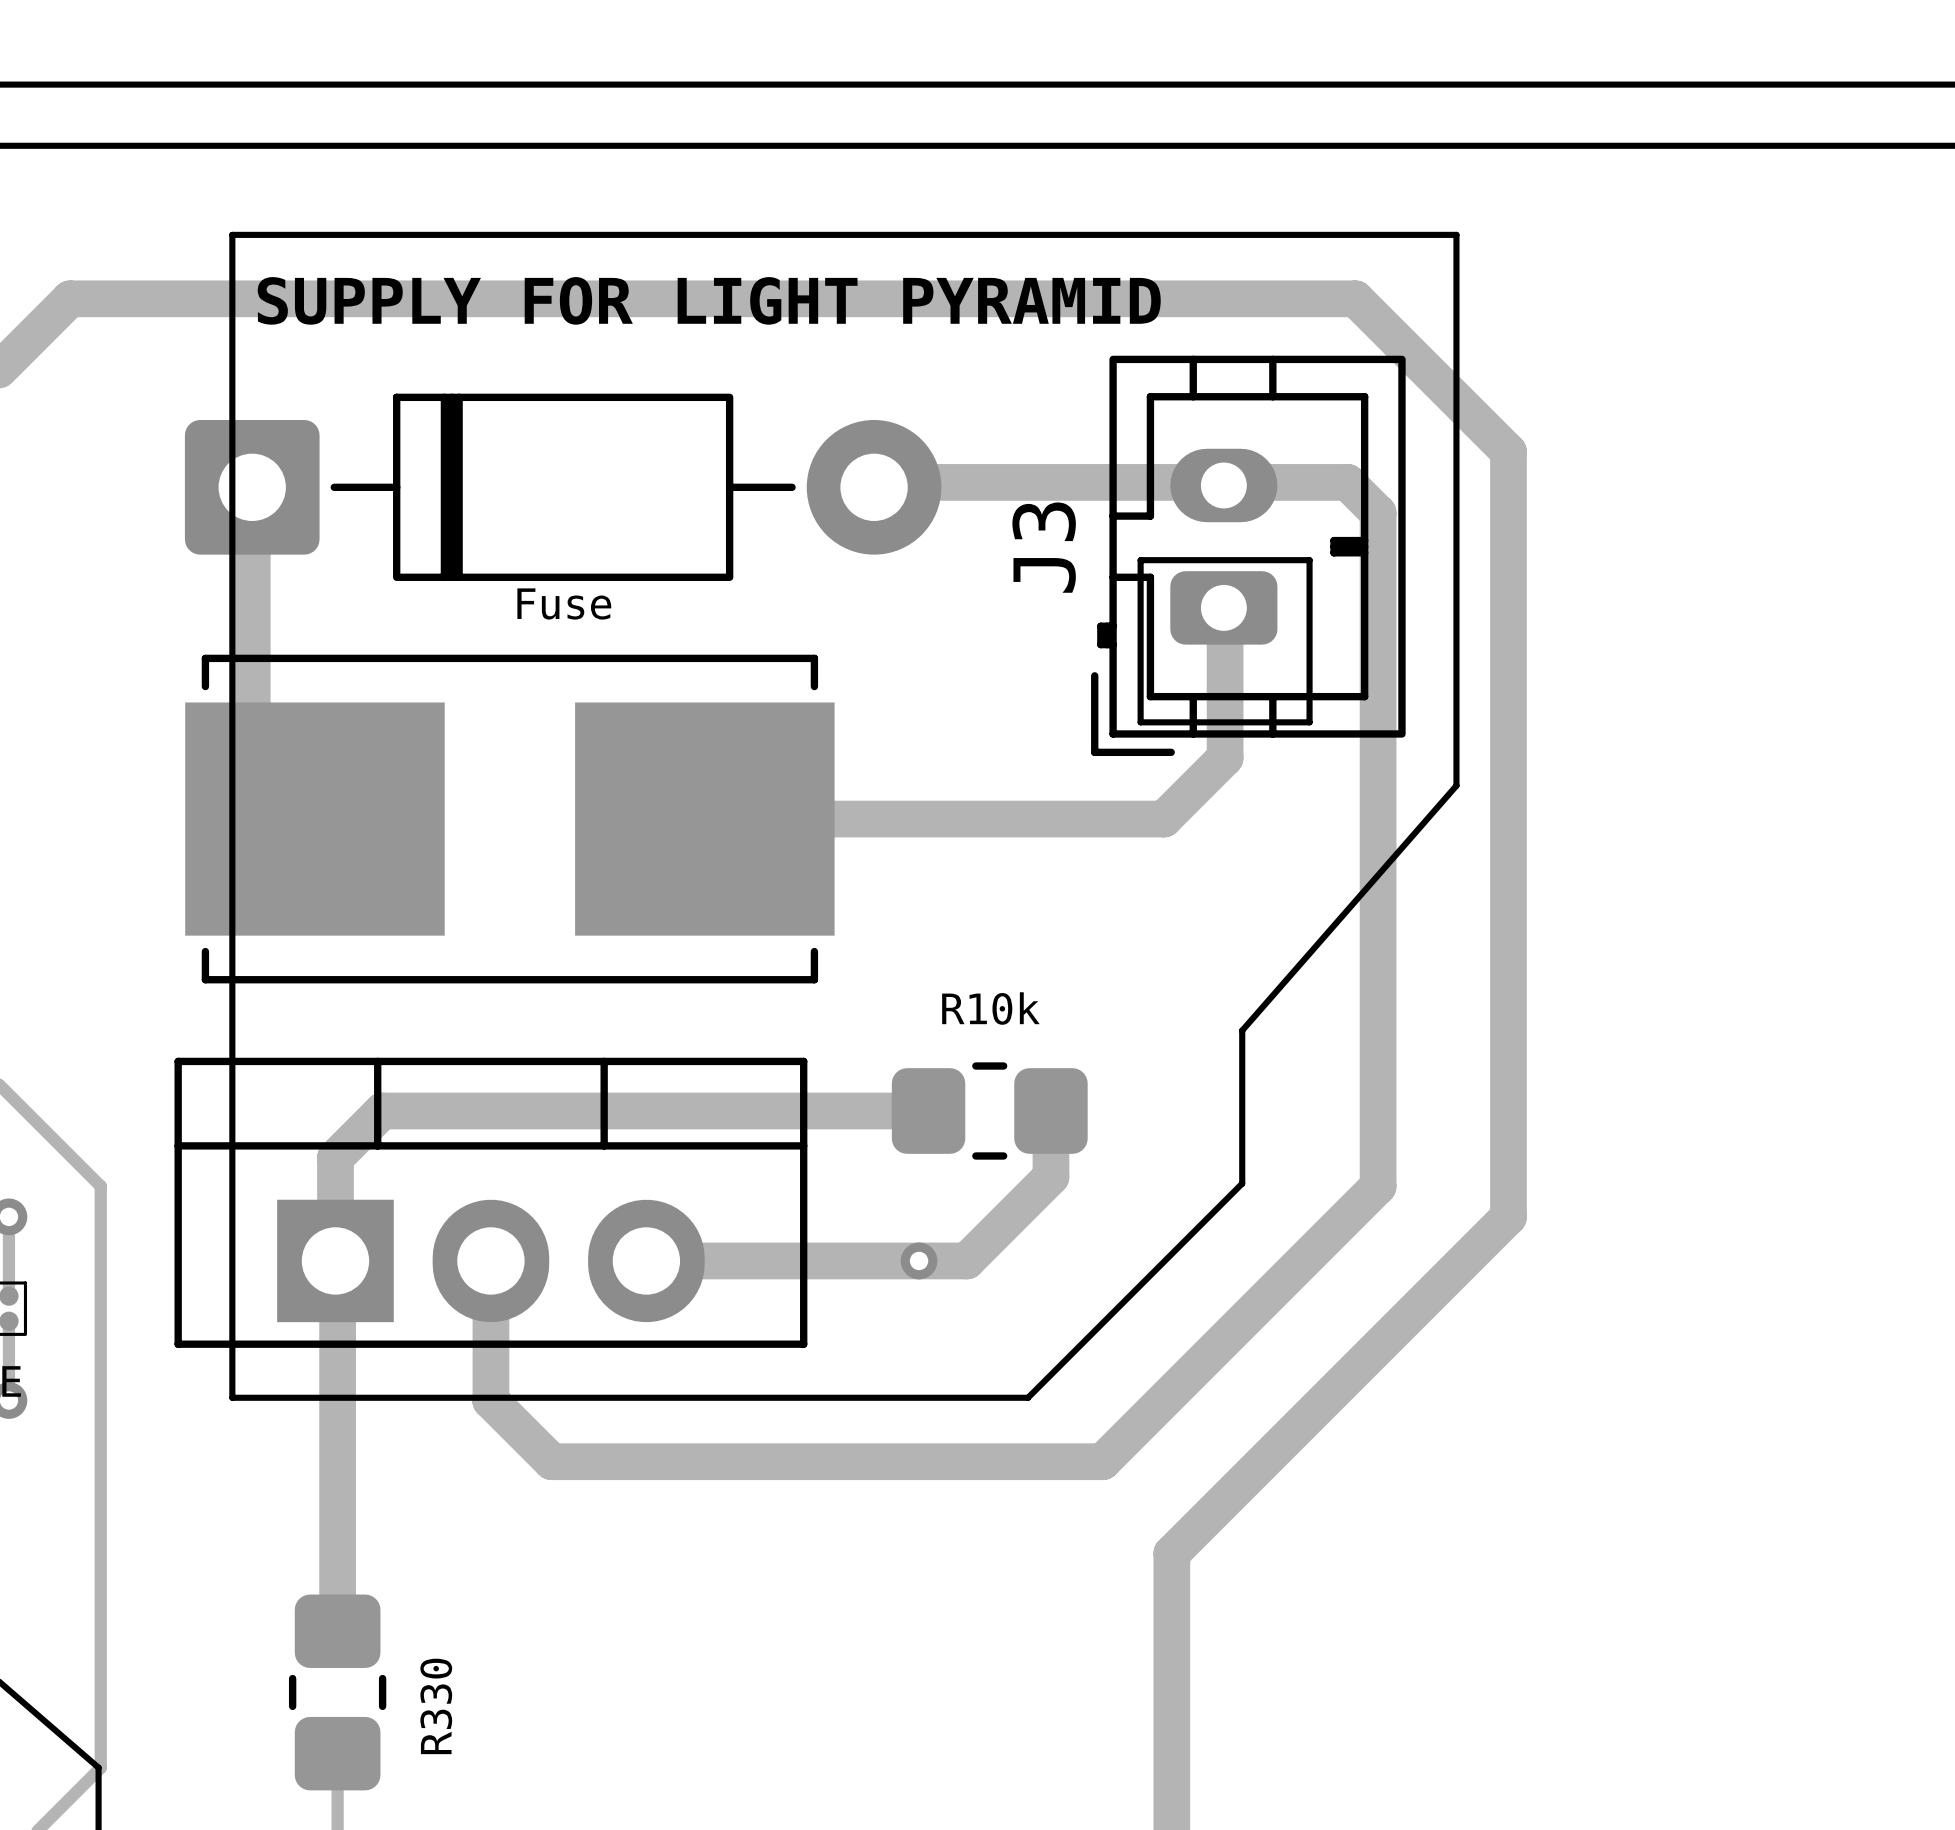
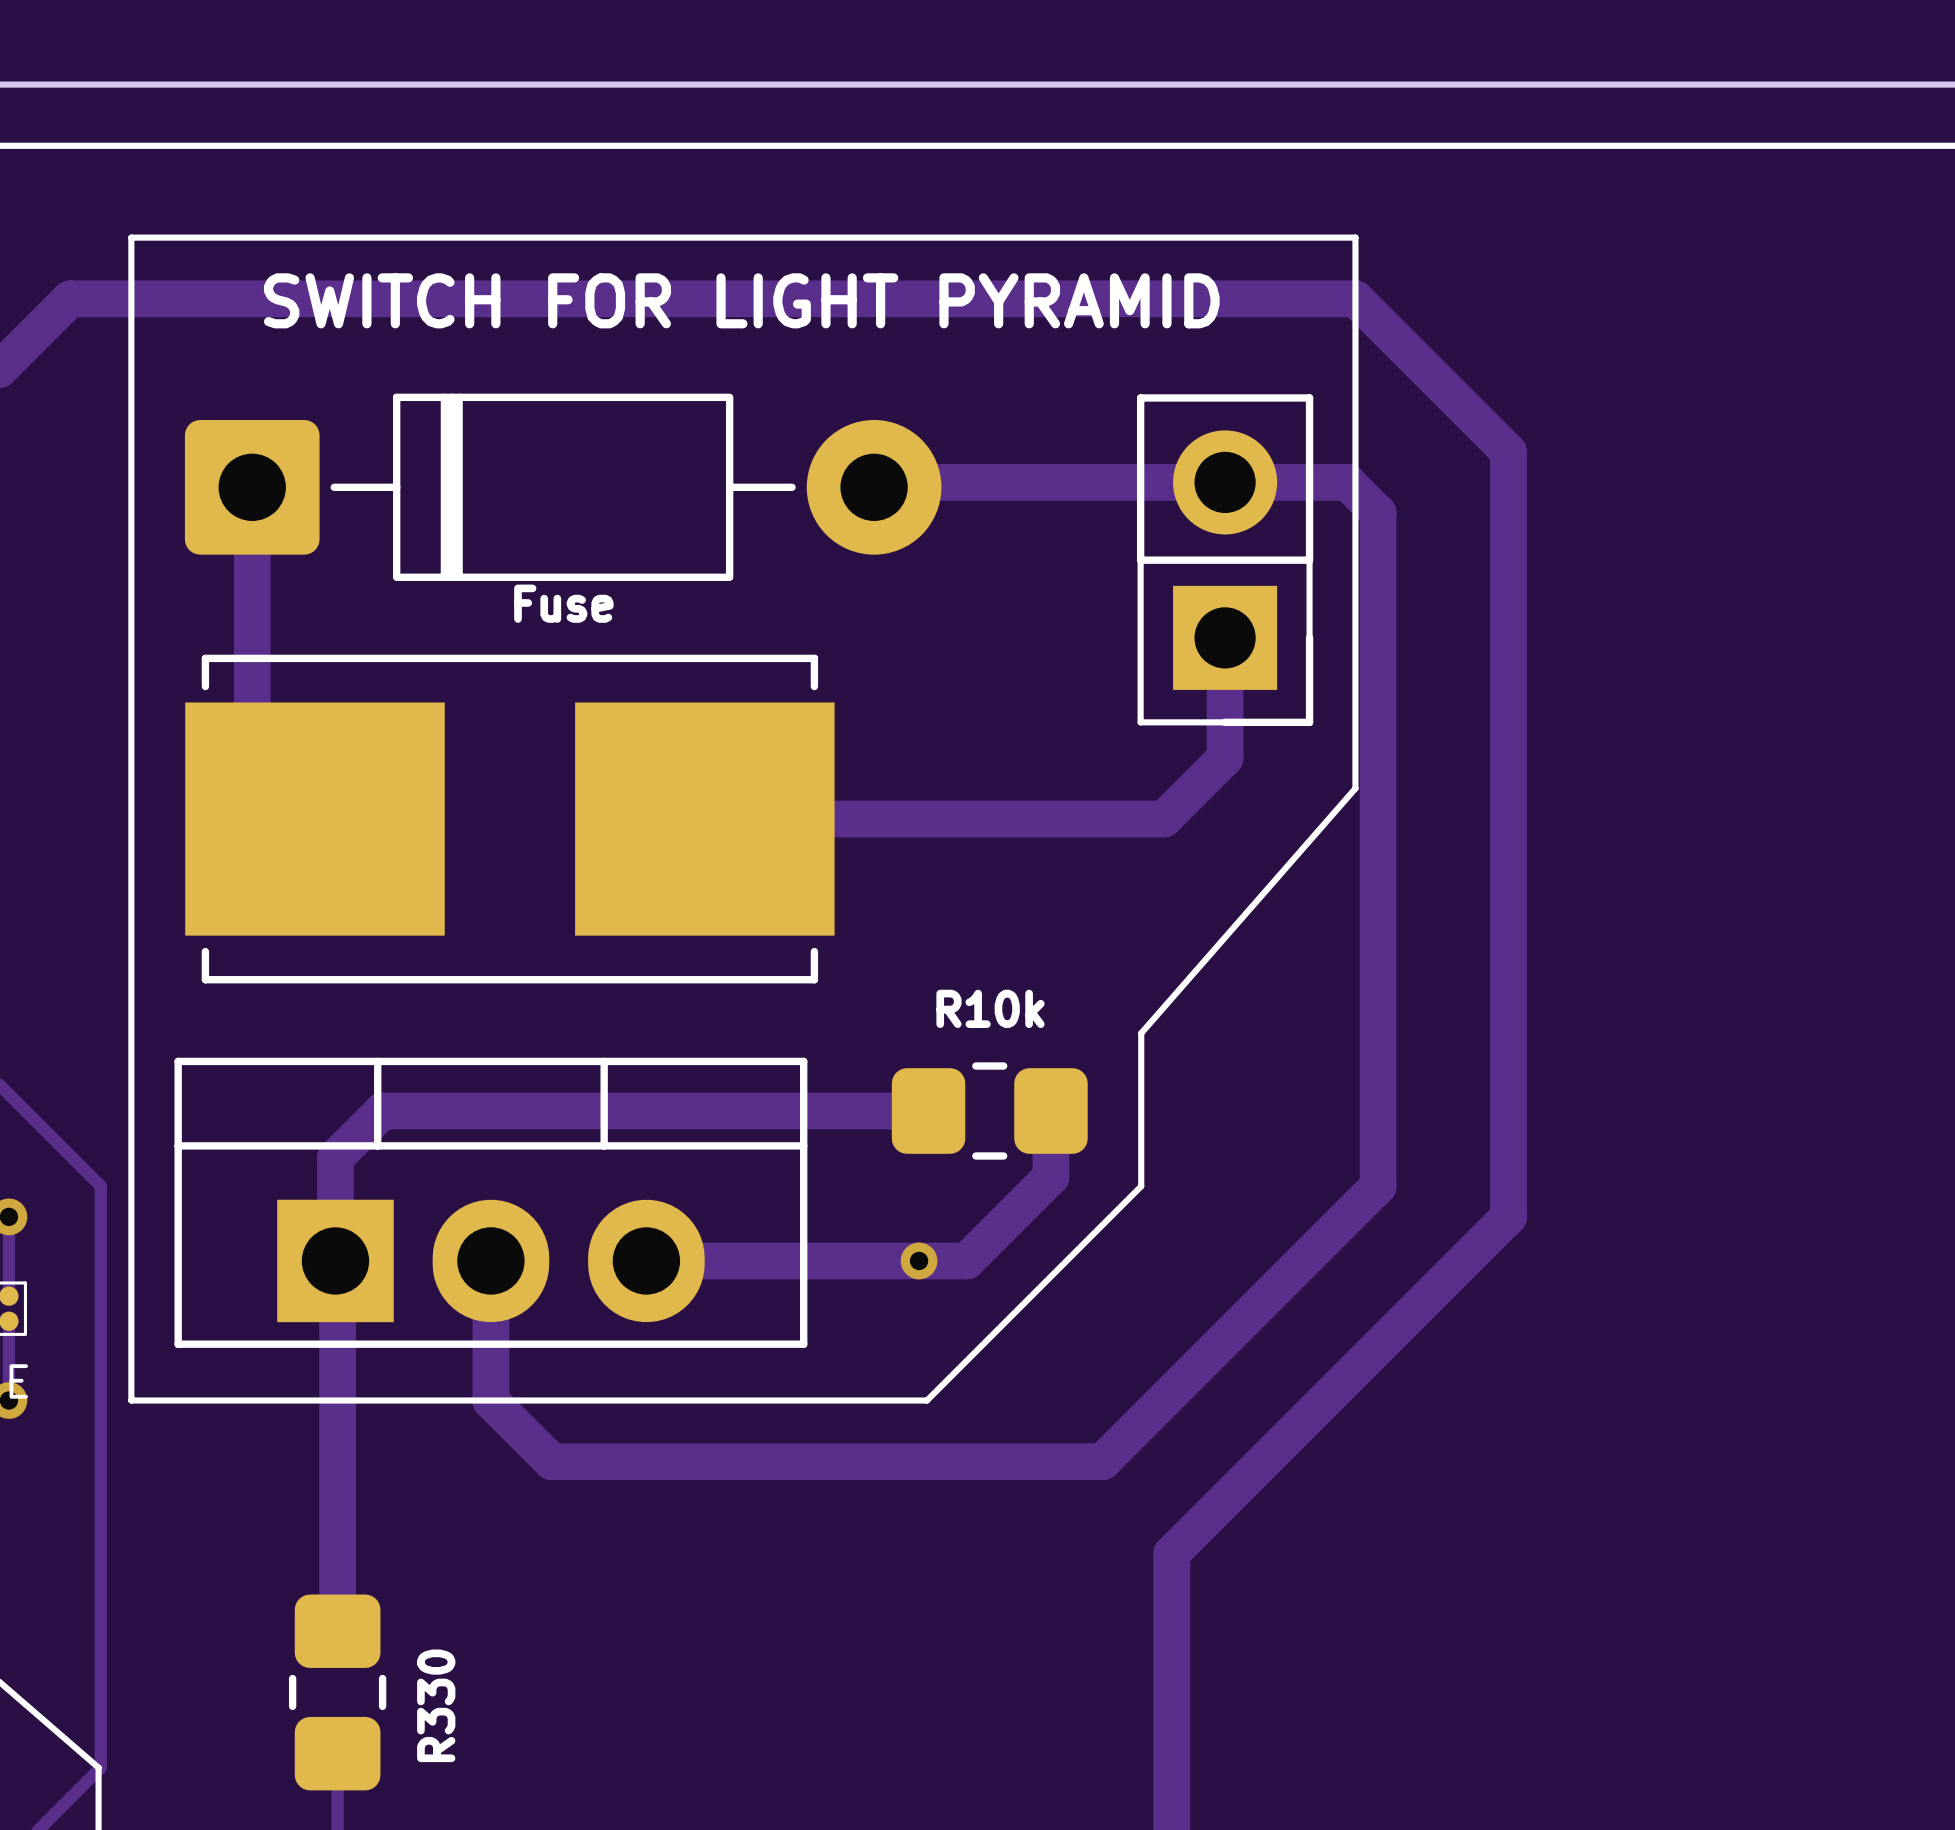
line: (232, 234) (1456, 234) (1456, 785) (1242, 1030) (1242, 1183) (1028, 1397) (232, 1397) (232, 234) -> (131, 237) (131, 1400) (927, 1400) (1141, 1186) (1141, 1033) (1355, 788) (1355, 237) (131, 237)
text: SUPPLY FOR LIGHT PYRAMID (709, 300) -> SWITCH FOR LIGHT PYRAMID (741, 300)
J3: (1248, 555) -> none
part: none -> (1225, 560)

